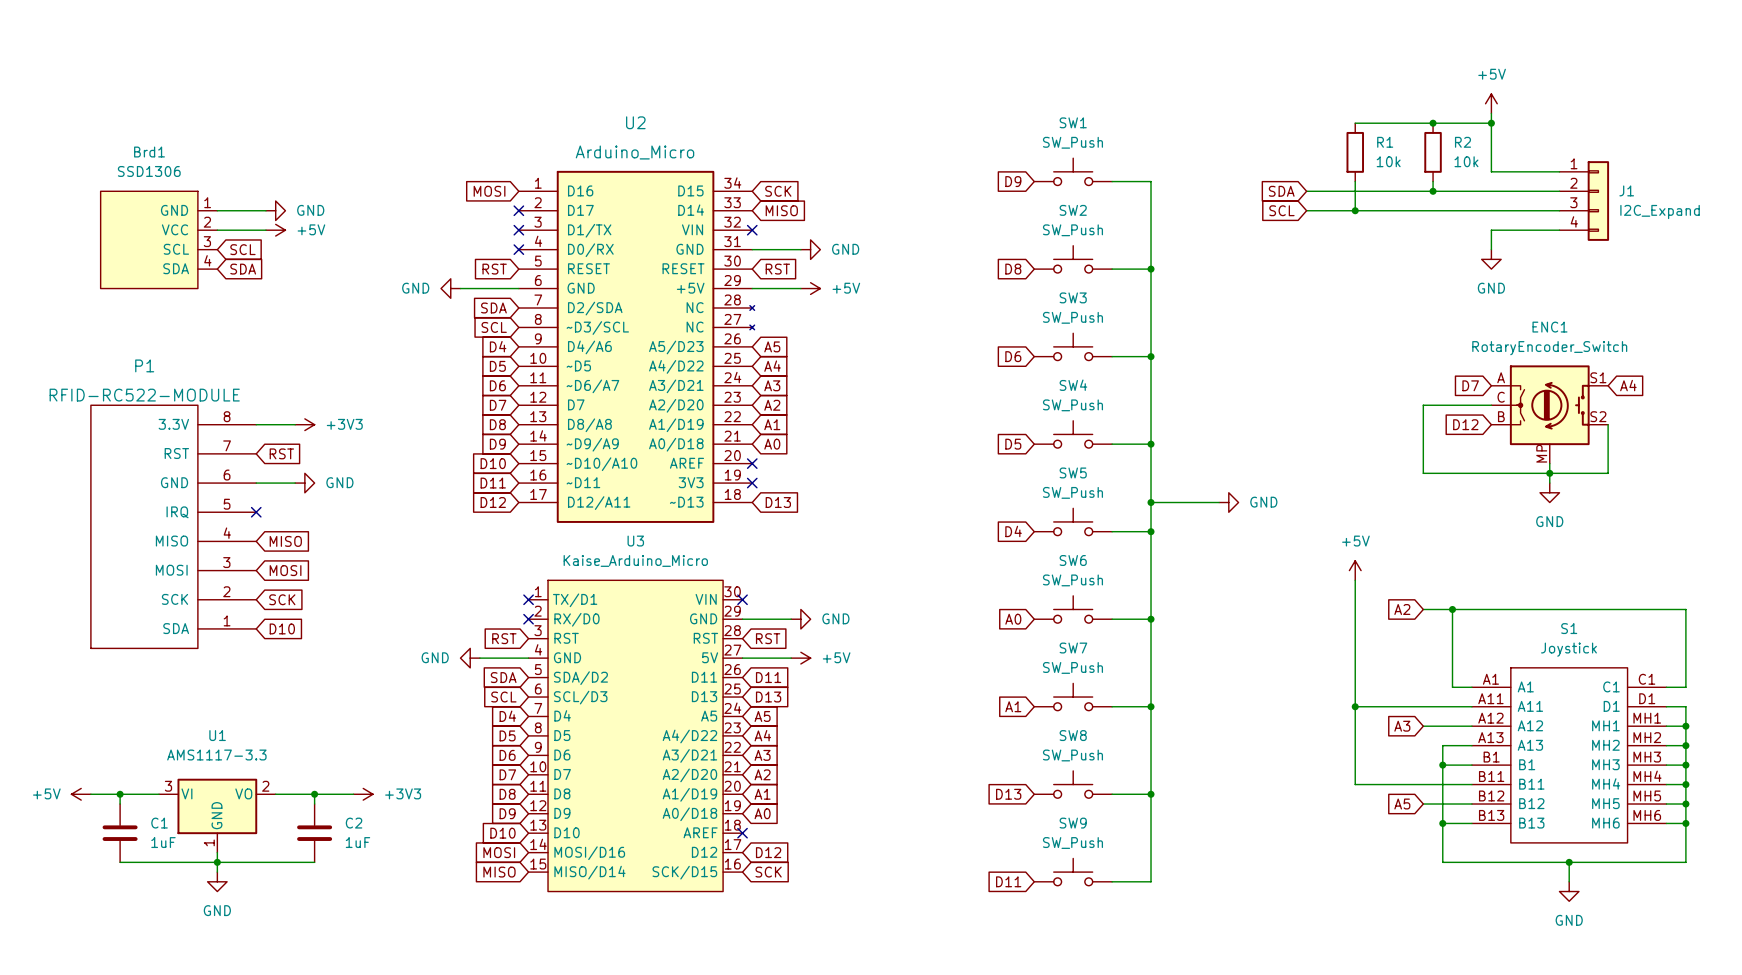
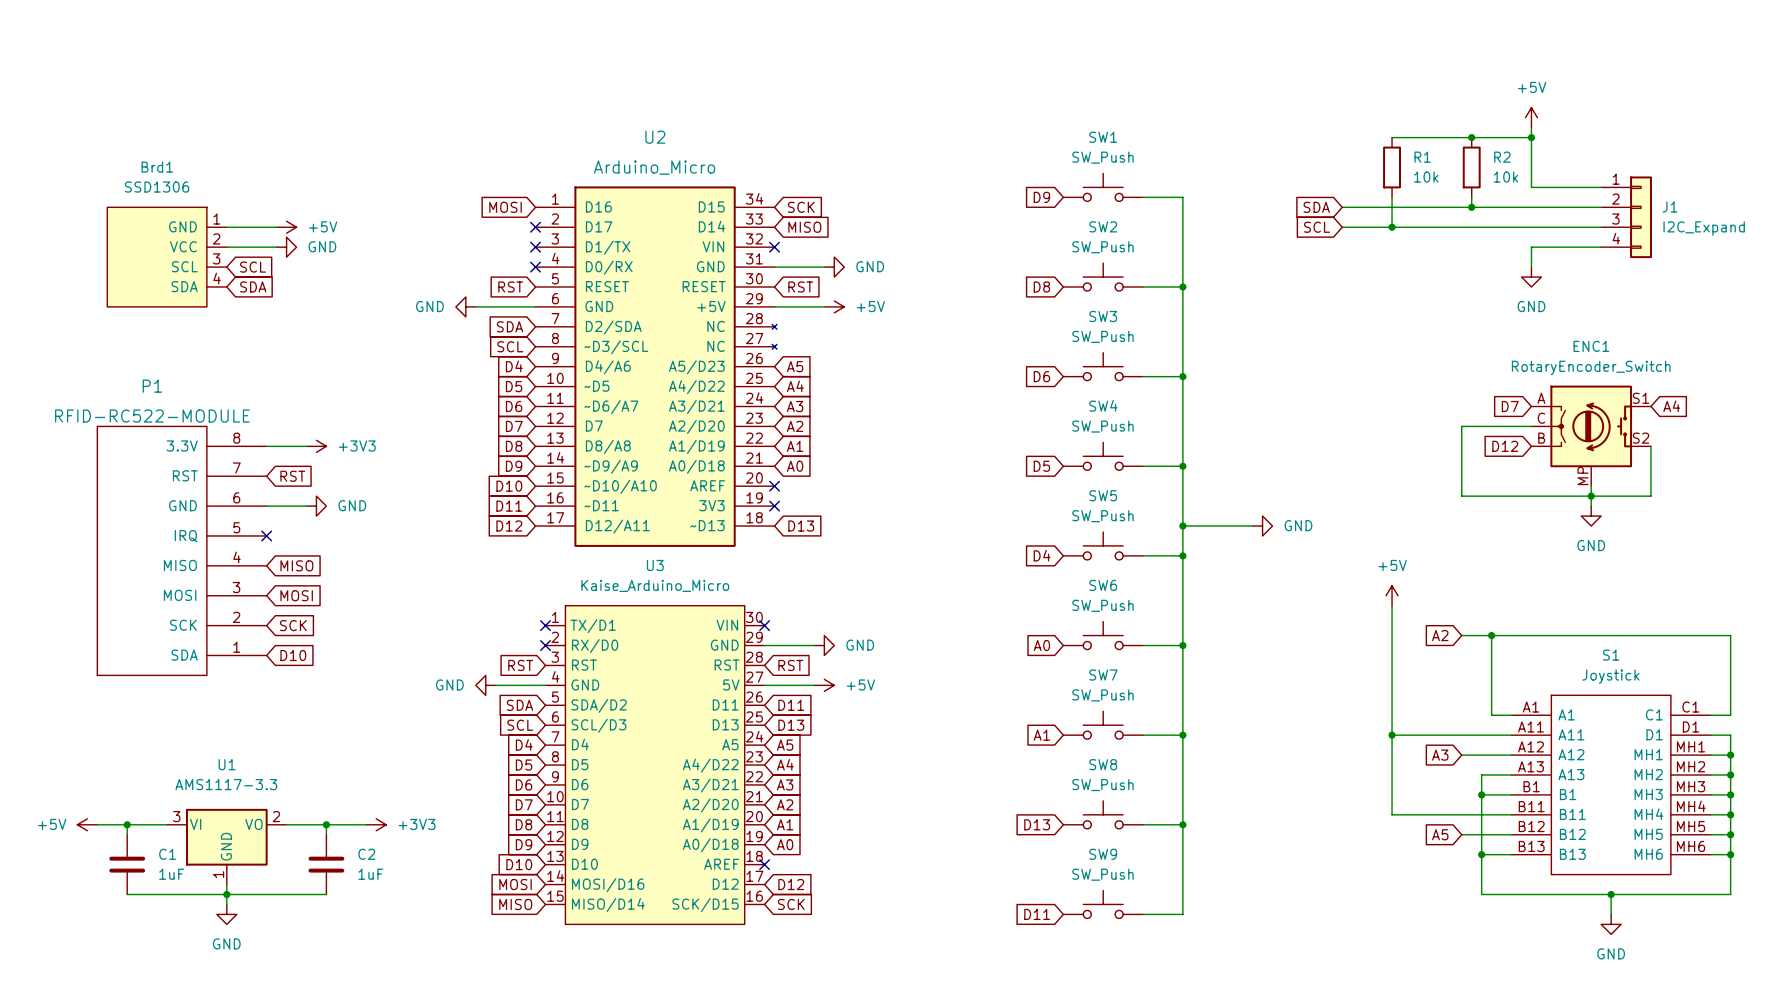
power symbol: GND (275, 210) -> +5V (286, 227)
power symbol: +5V (275, 230) -> GND (286, 247)

